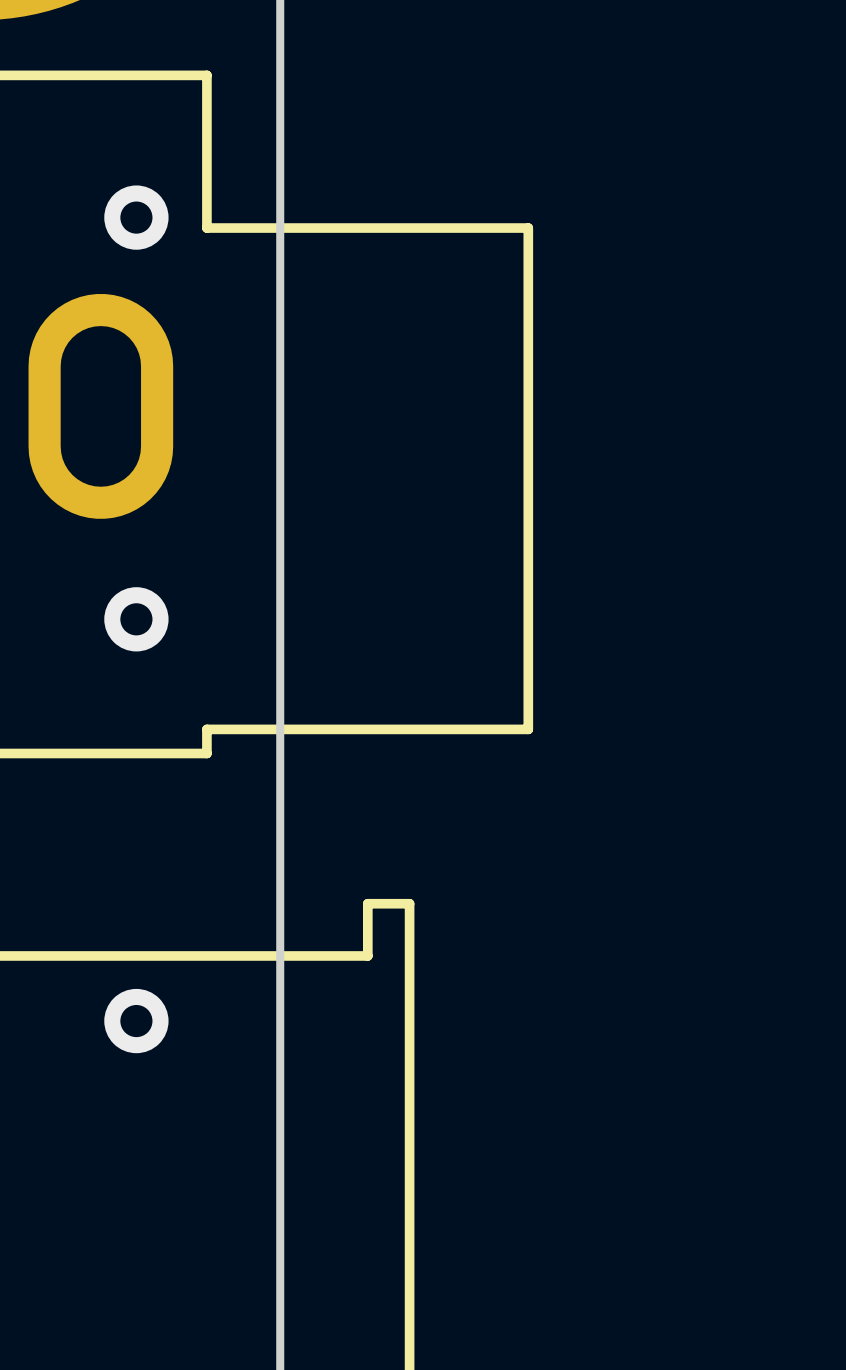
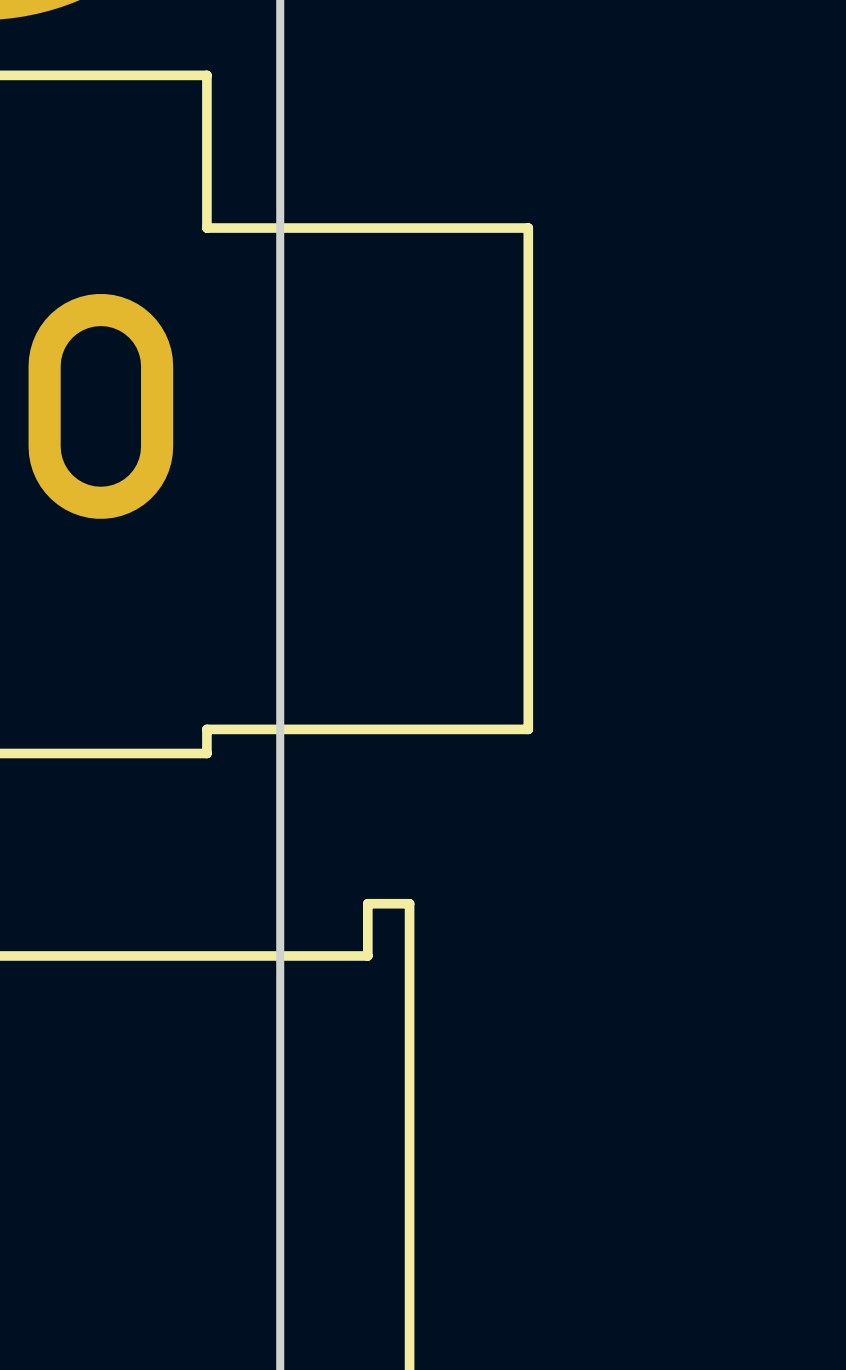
via: (136, 217) -> none
via: (136, 619) -> none
via: (136, 1021) -> none

